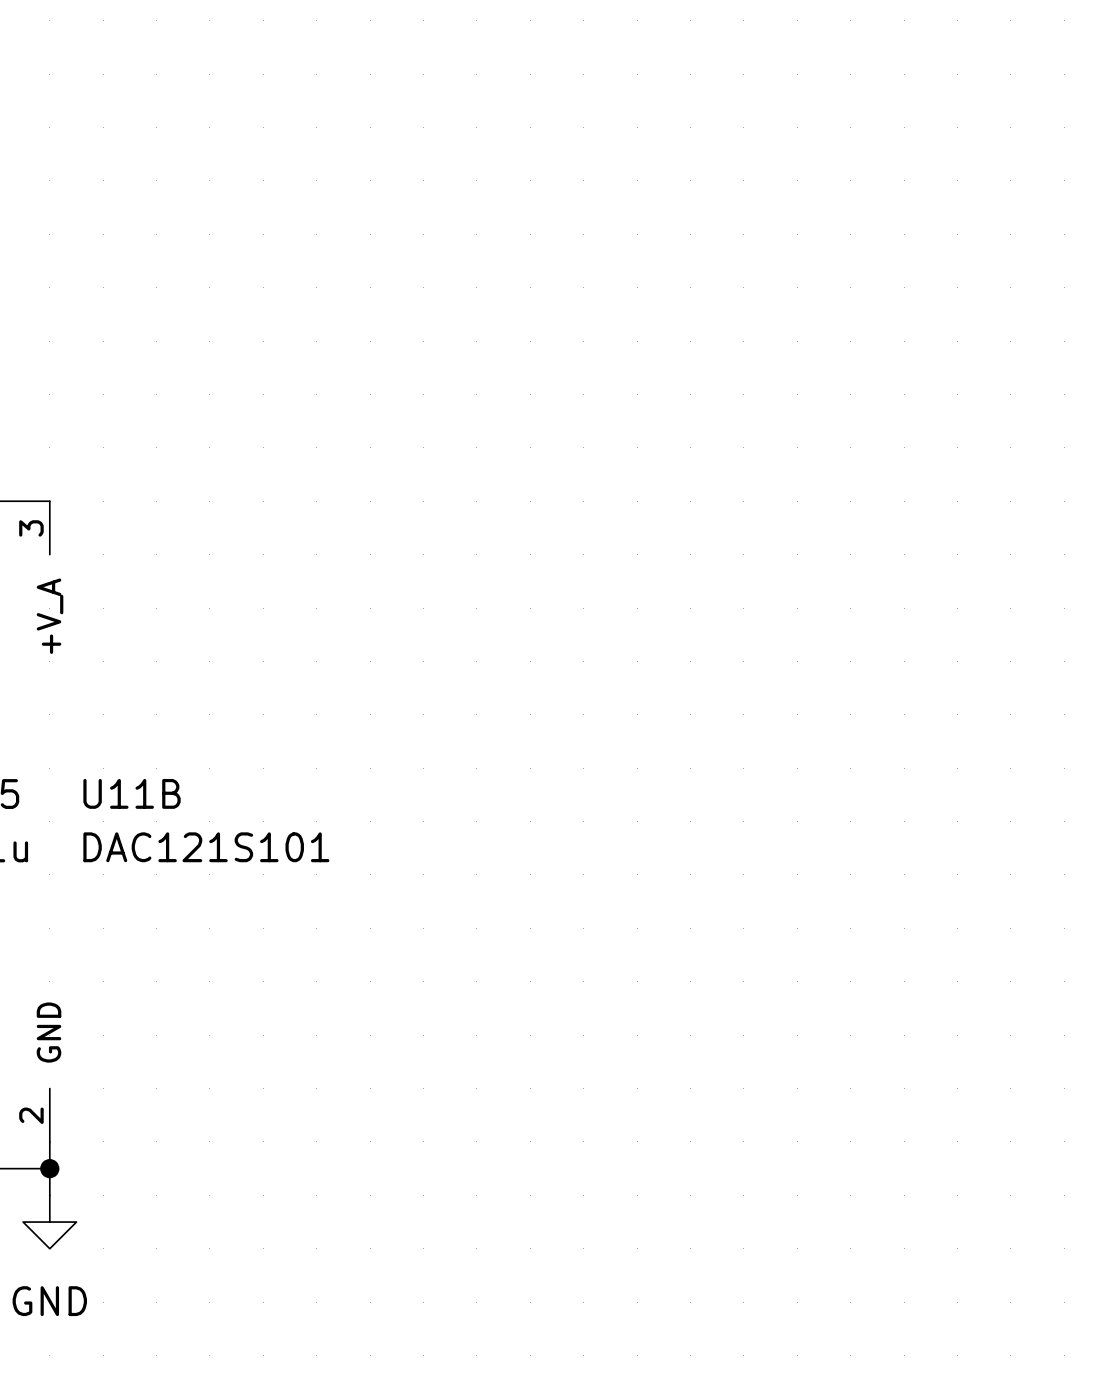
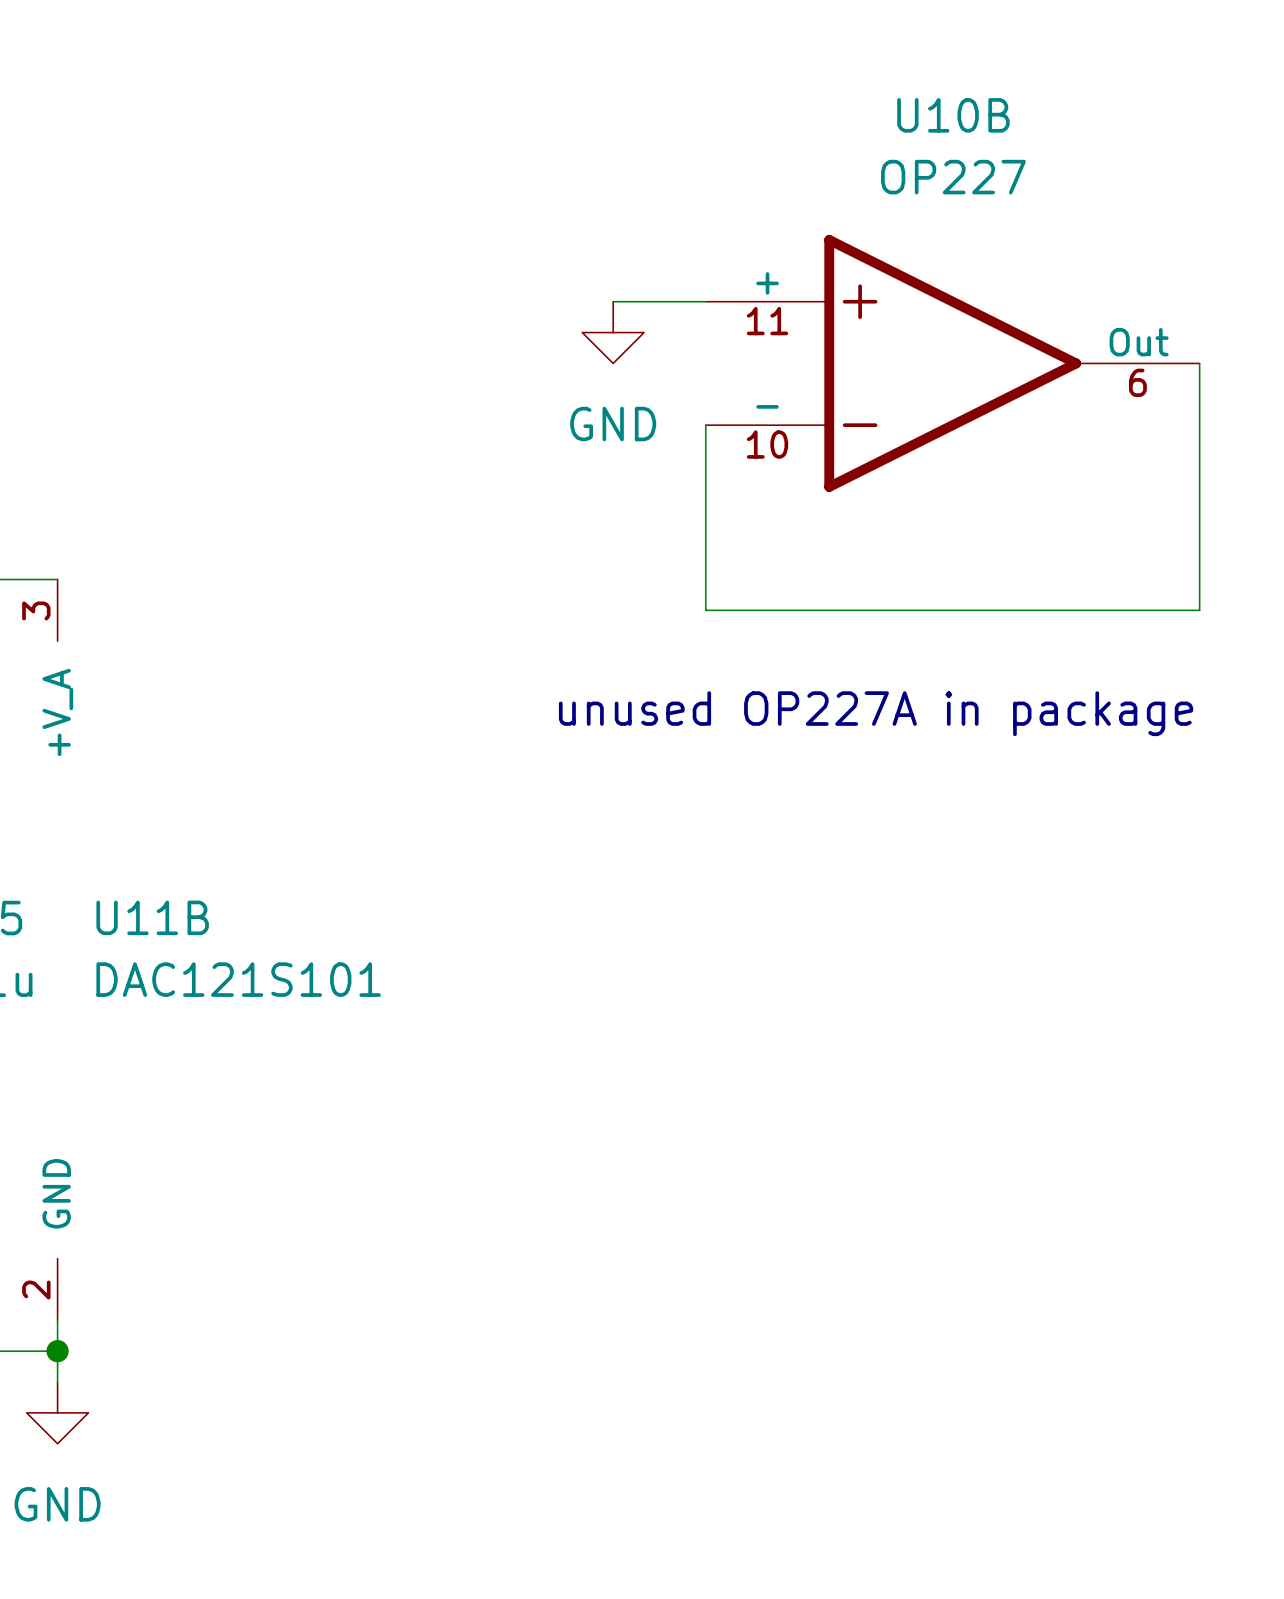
wire: none -> (613, 301) (705, 301)
power symbol: none -> GND (613, 332)
U10B: none -> OP227 (952, 363)
wire: none -> (1199, 363) (1199, 610) (705, 610) (705, 425)
text: none -> unused OP227A in package (876, 713)

